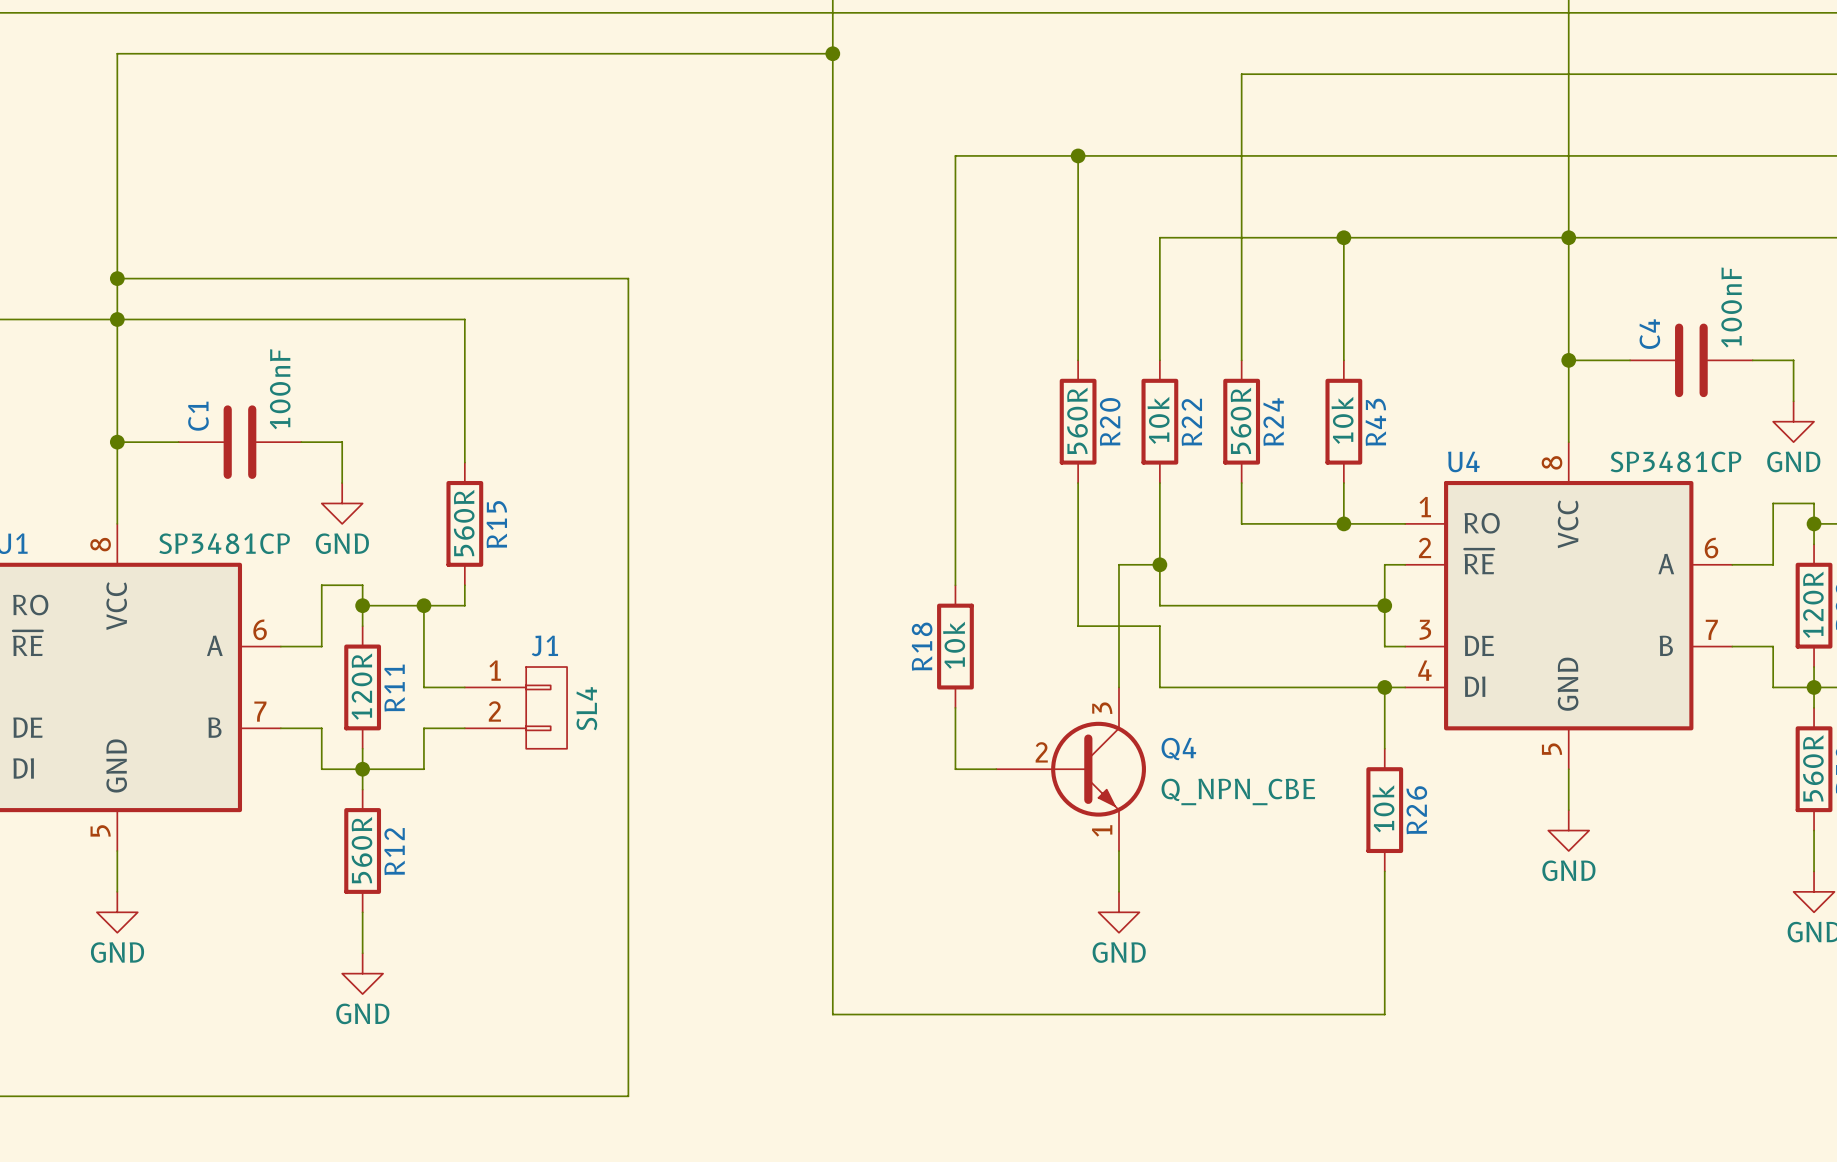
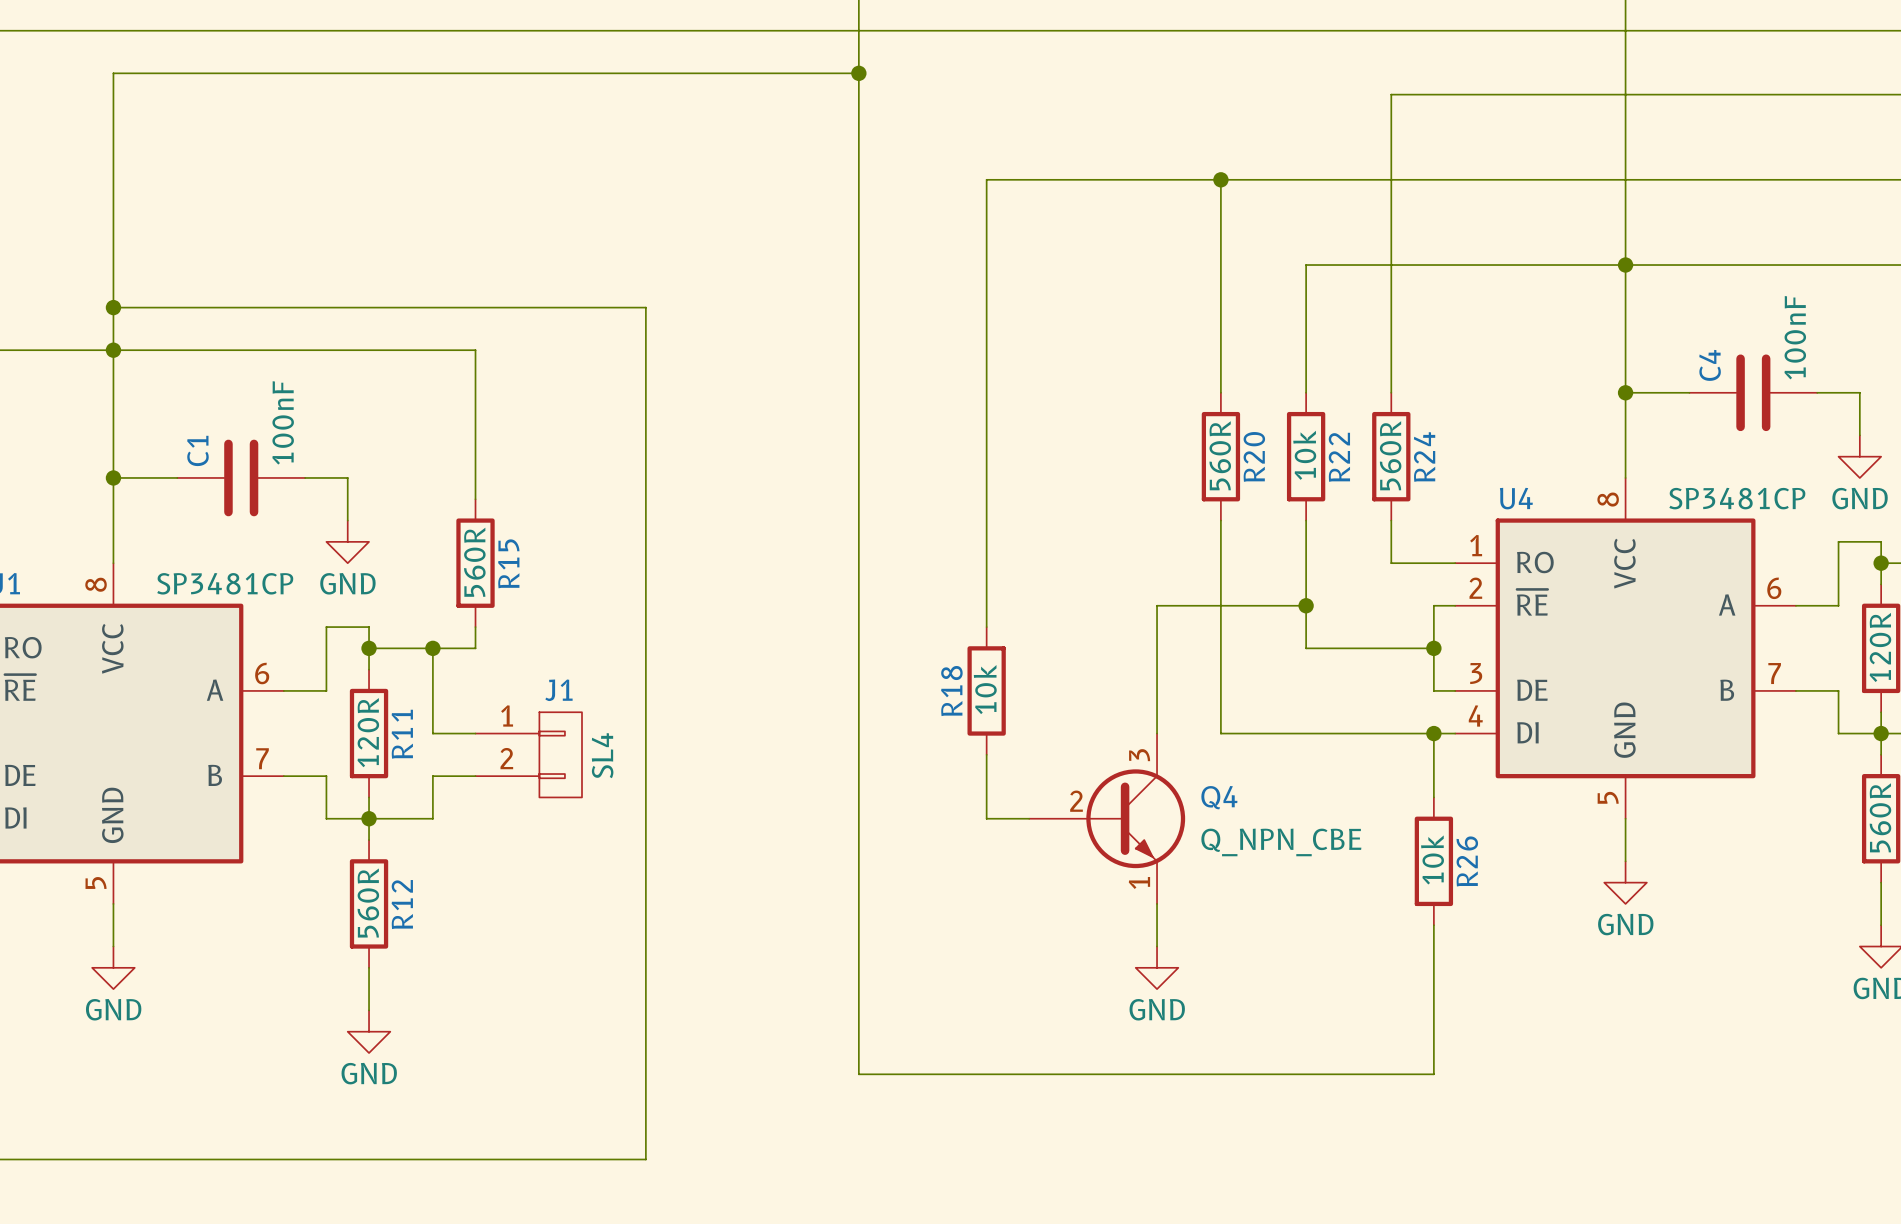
wire: (1343, 74) (1241, 74) (1241, 360) -> (1391, 94) (1391, 265)
wire: (1078, 155) (1078, 360) -> (1220, 179) (1220, 392)
junction: (1078, 155) -> none
junction: none -> (1220, 179)
wire: (1262, 237) (1159, 237) (1159, 360) -> (1306, 265) (1306, 392)
junction: (1343, 237) -> none
R43 value: 10k (1342, 420) -> 560R (1390, 455)
R20 position: (1078, 421) -> (1220, 456)
R22 position: (1159, 421) -> (1306, 456)
R24: 560R (1241, 421) -> none
R43 name: R43 (1375, 422) -> R24 (1424, 457)
wire: (1078, 483) (1078, 626) (1159, 626) (1159, 687) (1180, 687) -> (1220, 520) (1220, 733)
wire: (1159, 483) (1159, 605) (1262, 605) -> (1306, 520) (1306, 648)
wire: (1241, 483) (1241, 523) (1343, 523) -> none
junction: (1343, 523) -> none
wire: none -> (1199, 605) (1306, 605)
junction: (1159, 564) -> none
junction: none -> (1306, 605)

